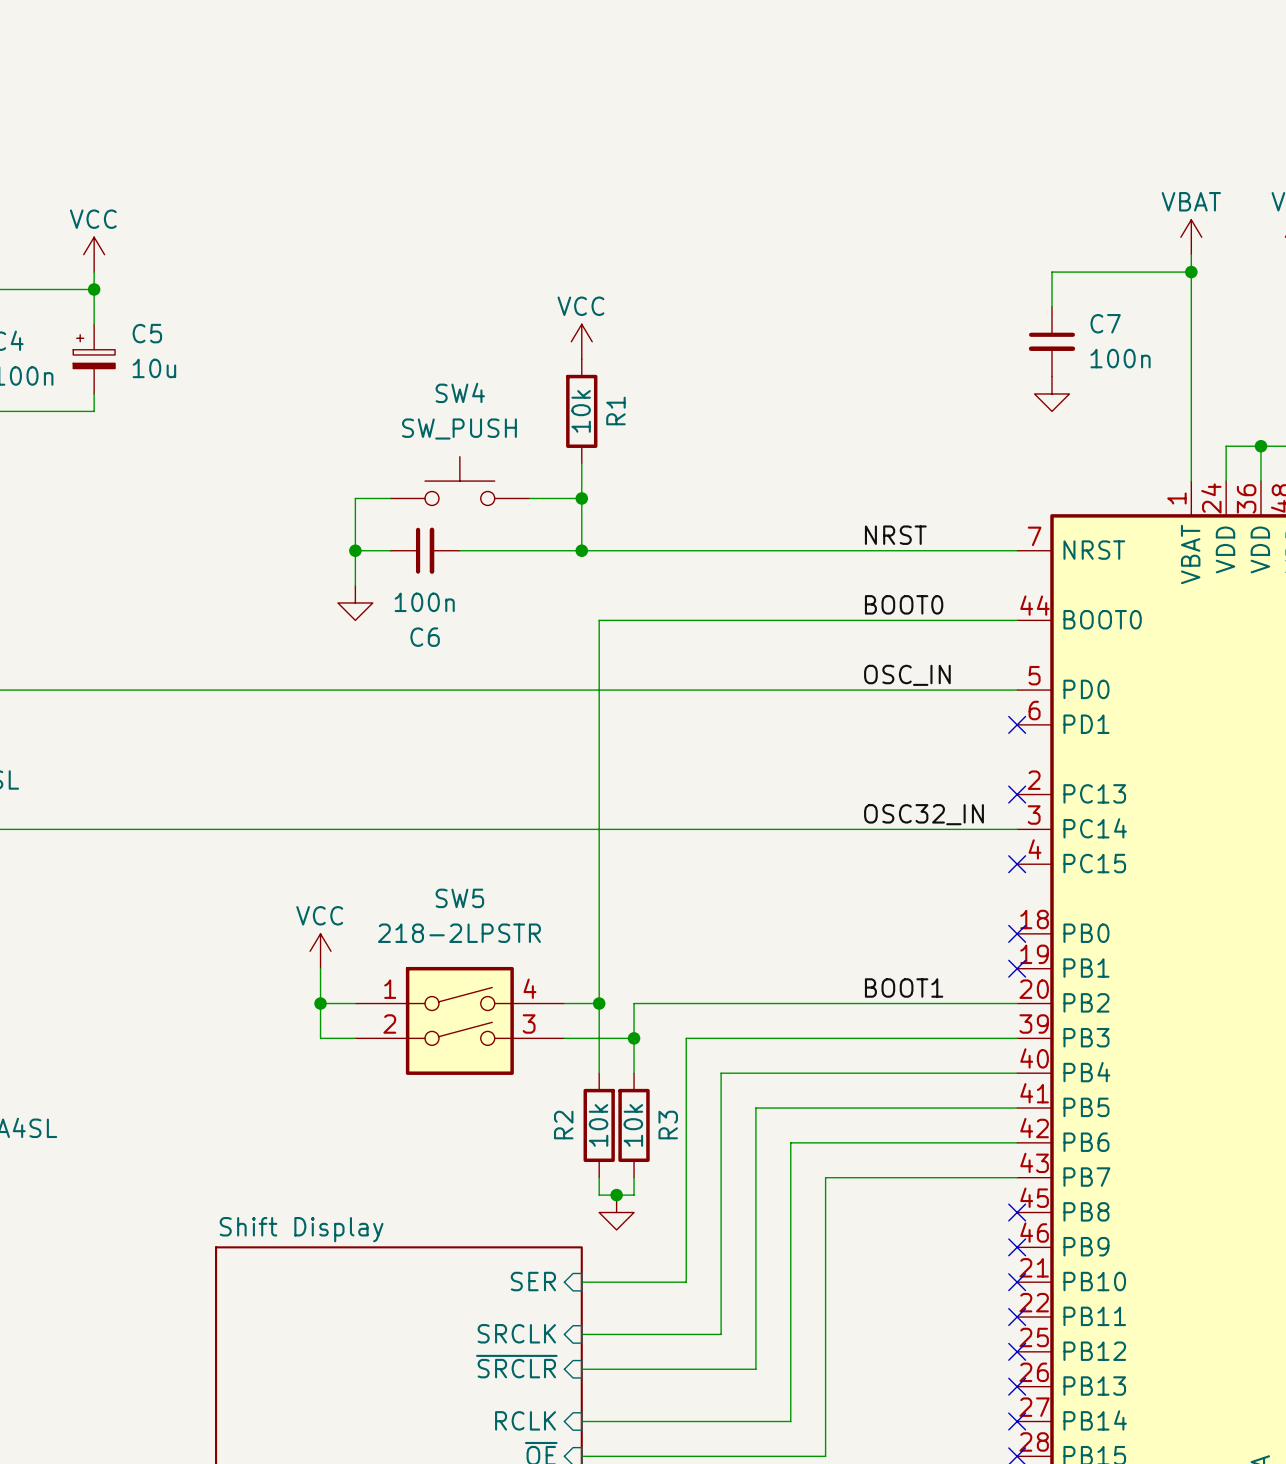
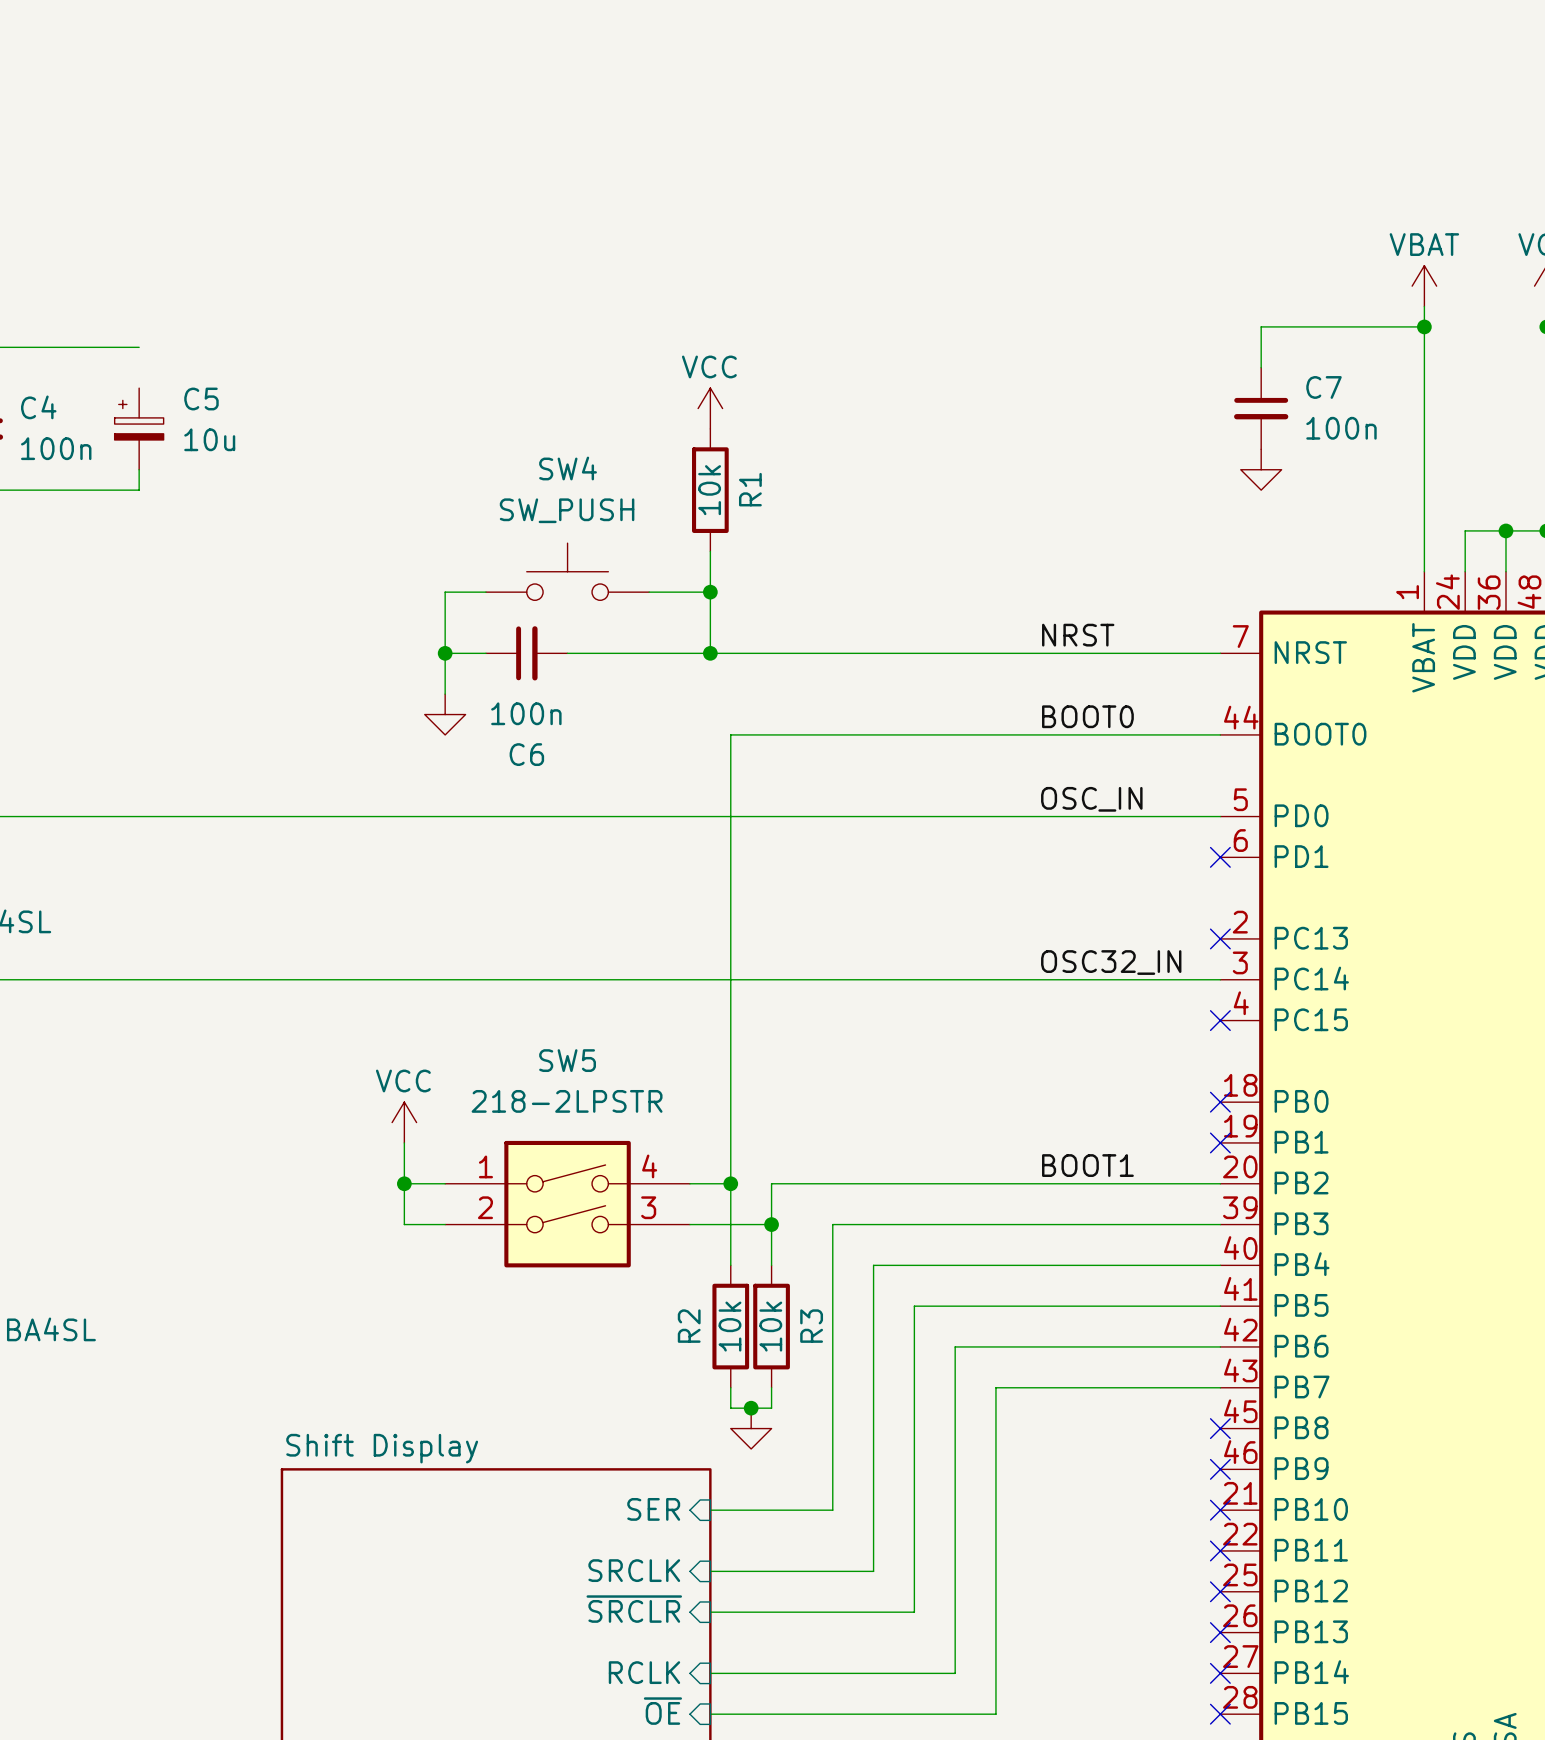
power symbol: VCC (94, 254) -> none
wire: (94, 272) (94, 324) -> none
junction: (94, 289) -> none

